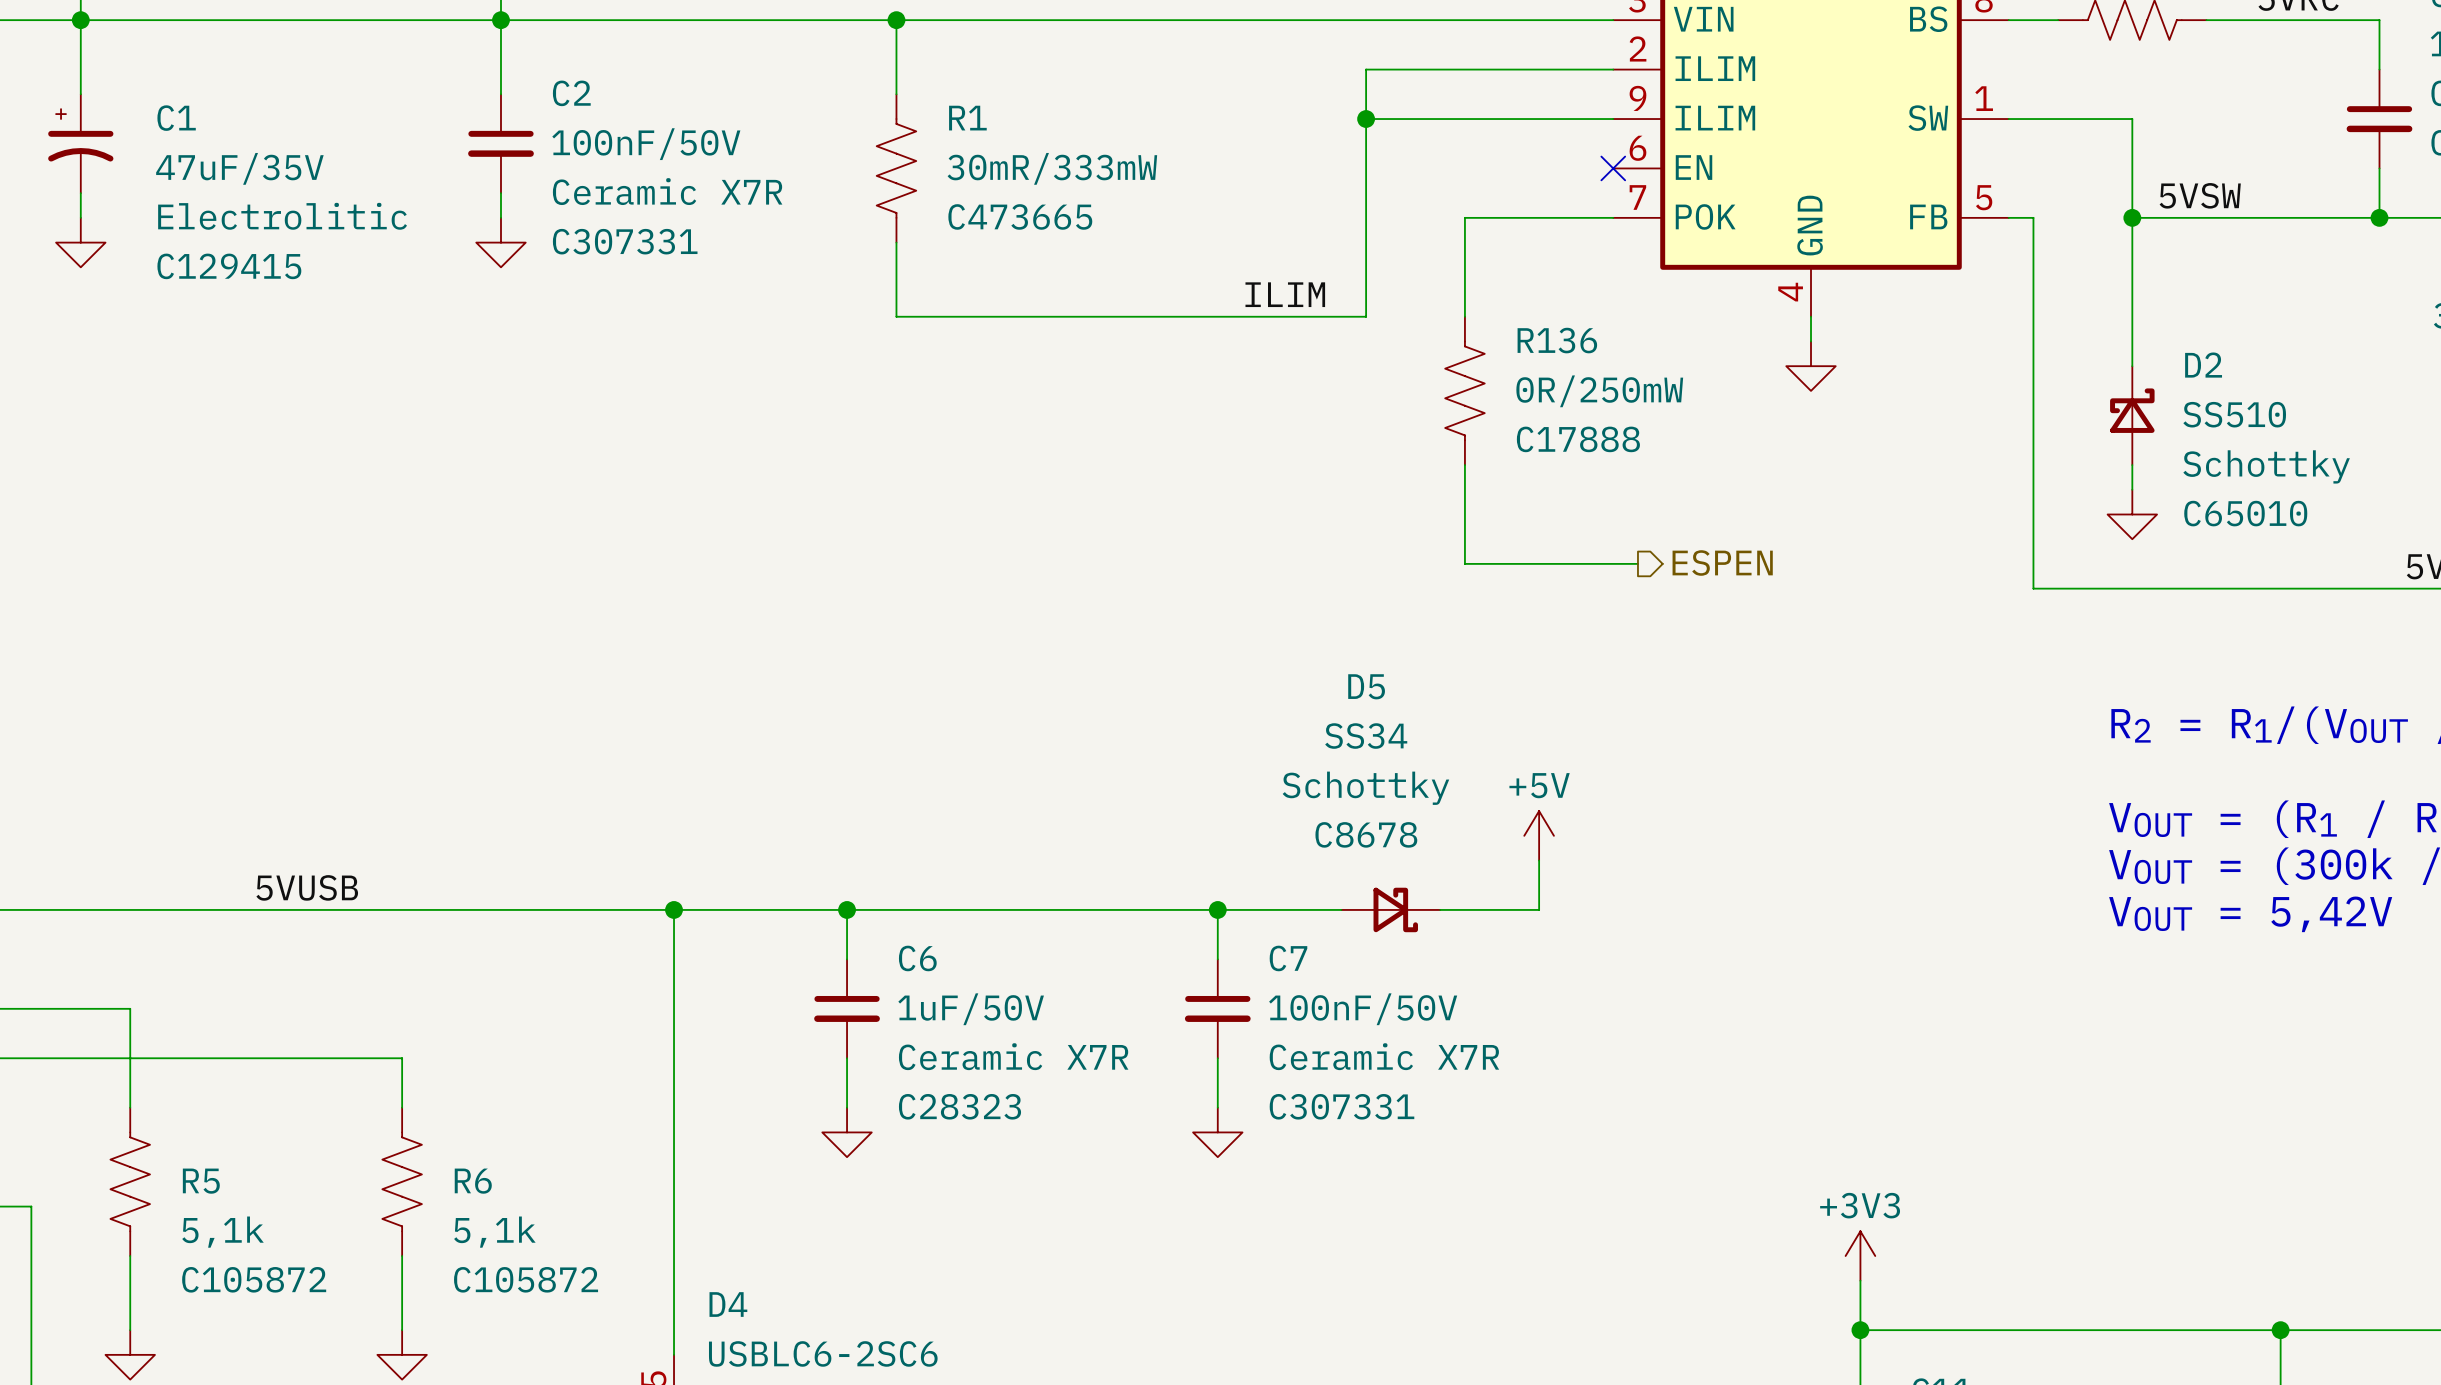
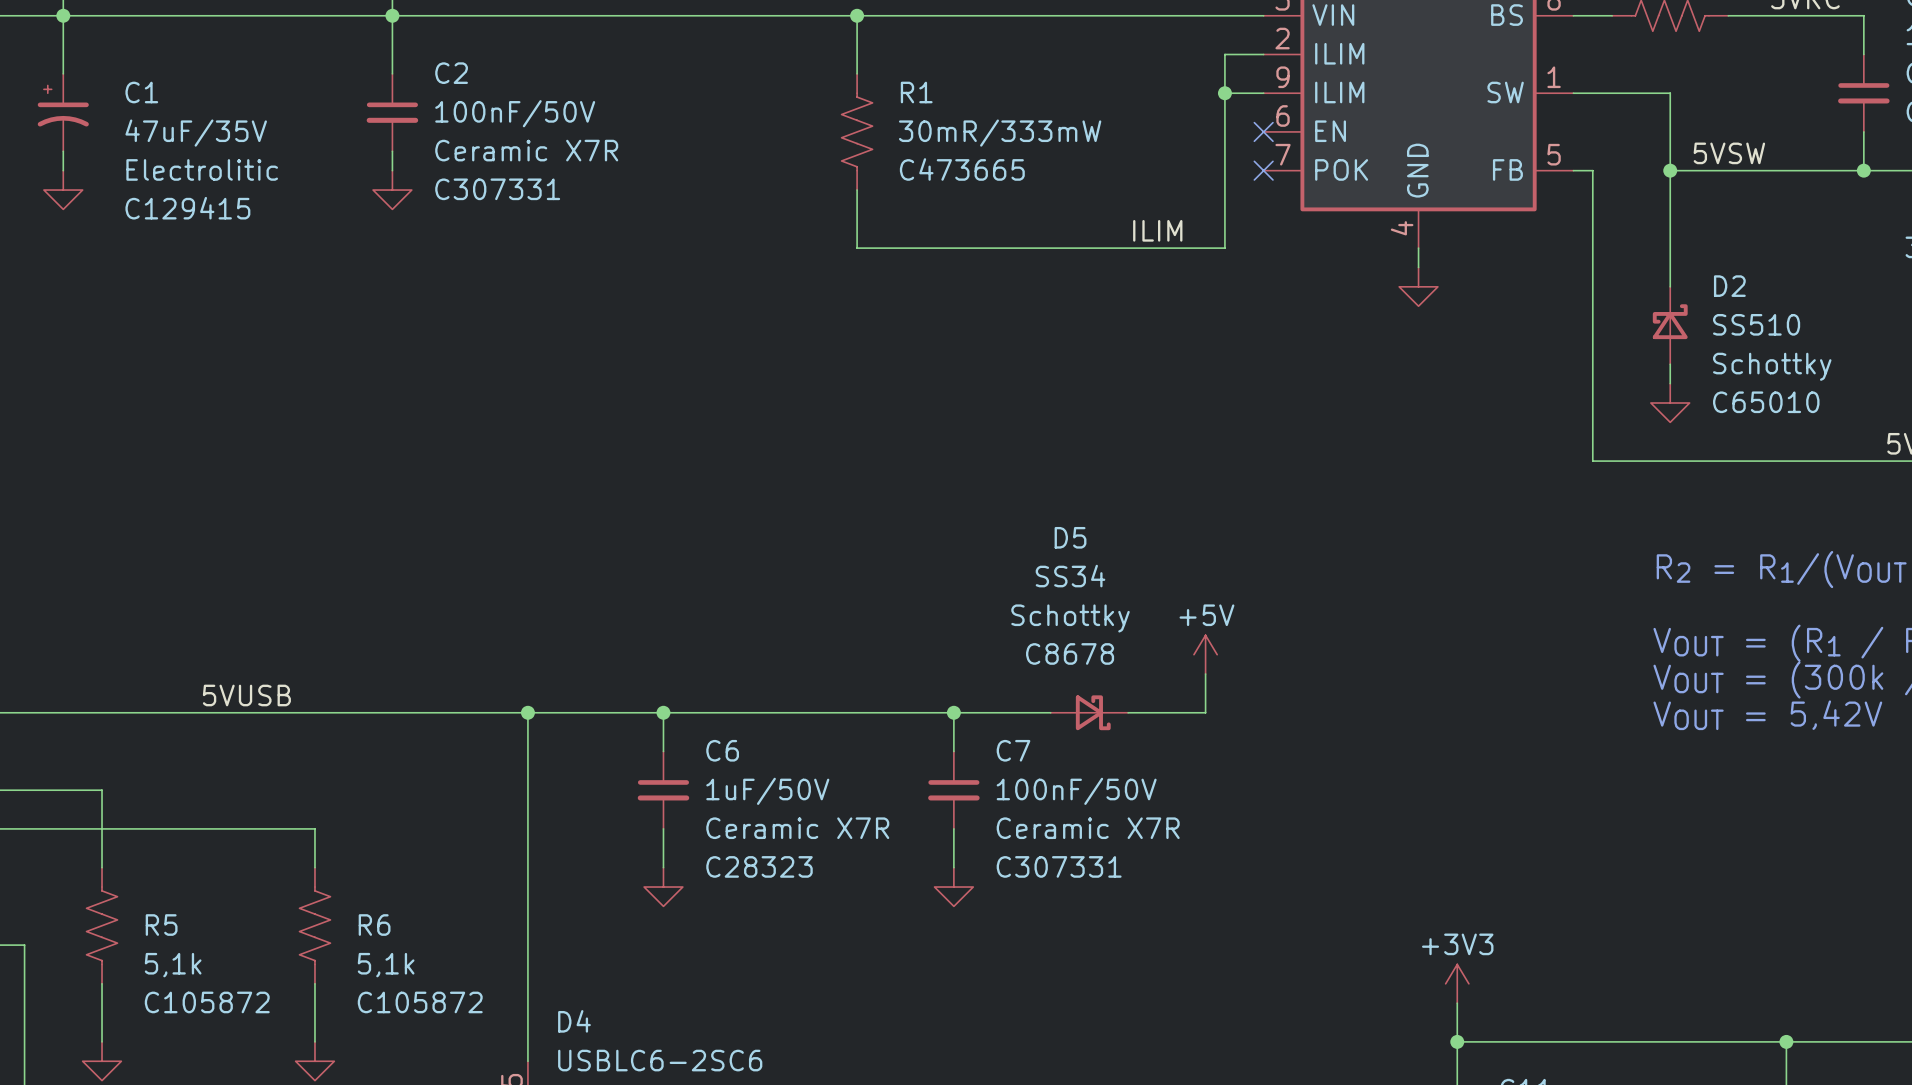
wire: (896, 20) (896, 94) -> (857, 15) (857, 73)
junction: (896, 20) -> none
junction: none -> (857, 15)
wire: (1563, 69) (1366, 69) (1366, 316) -> (1224, 54) (1224, 248) (1070, 248)
wire: (1366, 119) (1563, 119) -> none
junction: (1366, 119) -> none
junction: none -> (1224, 93)
R1 position: (896, 168) -> (857, 131)
wire: (1613, 217) (1464, 217) (1464, 316) -> none
no-connect mark: none -> (1263, 170)
wire: (896, 242) (896, 316) (1094, 316) -> (857, 190) (857, 248)
label position: ILIM (1285, 294) -> ILIM (1157, 230)
R136: 0R/250mW (1464, 390) -> none
wire: (1464, 465) (1464, 563) (1637, 563) -> none
hierarchical label: ESPEN (1722, 563) -> none

